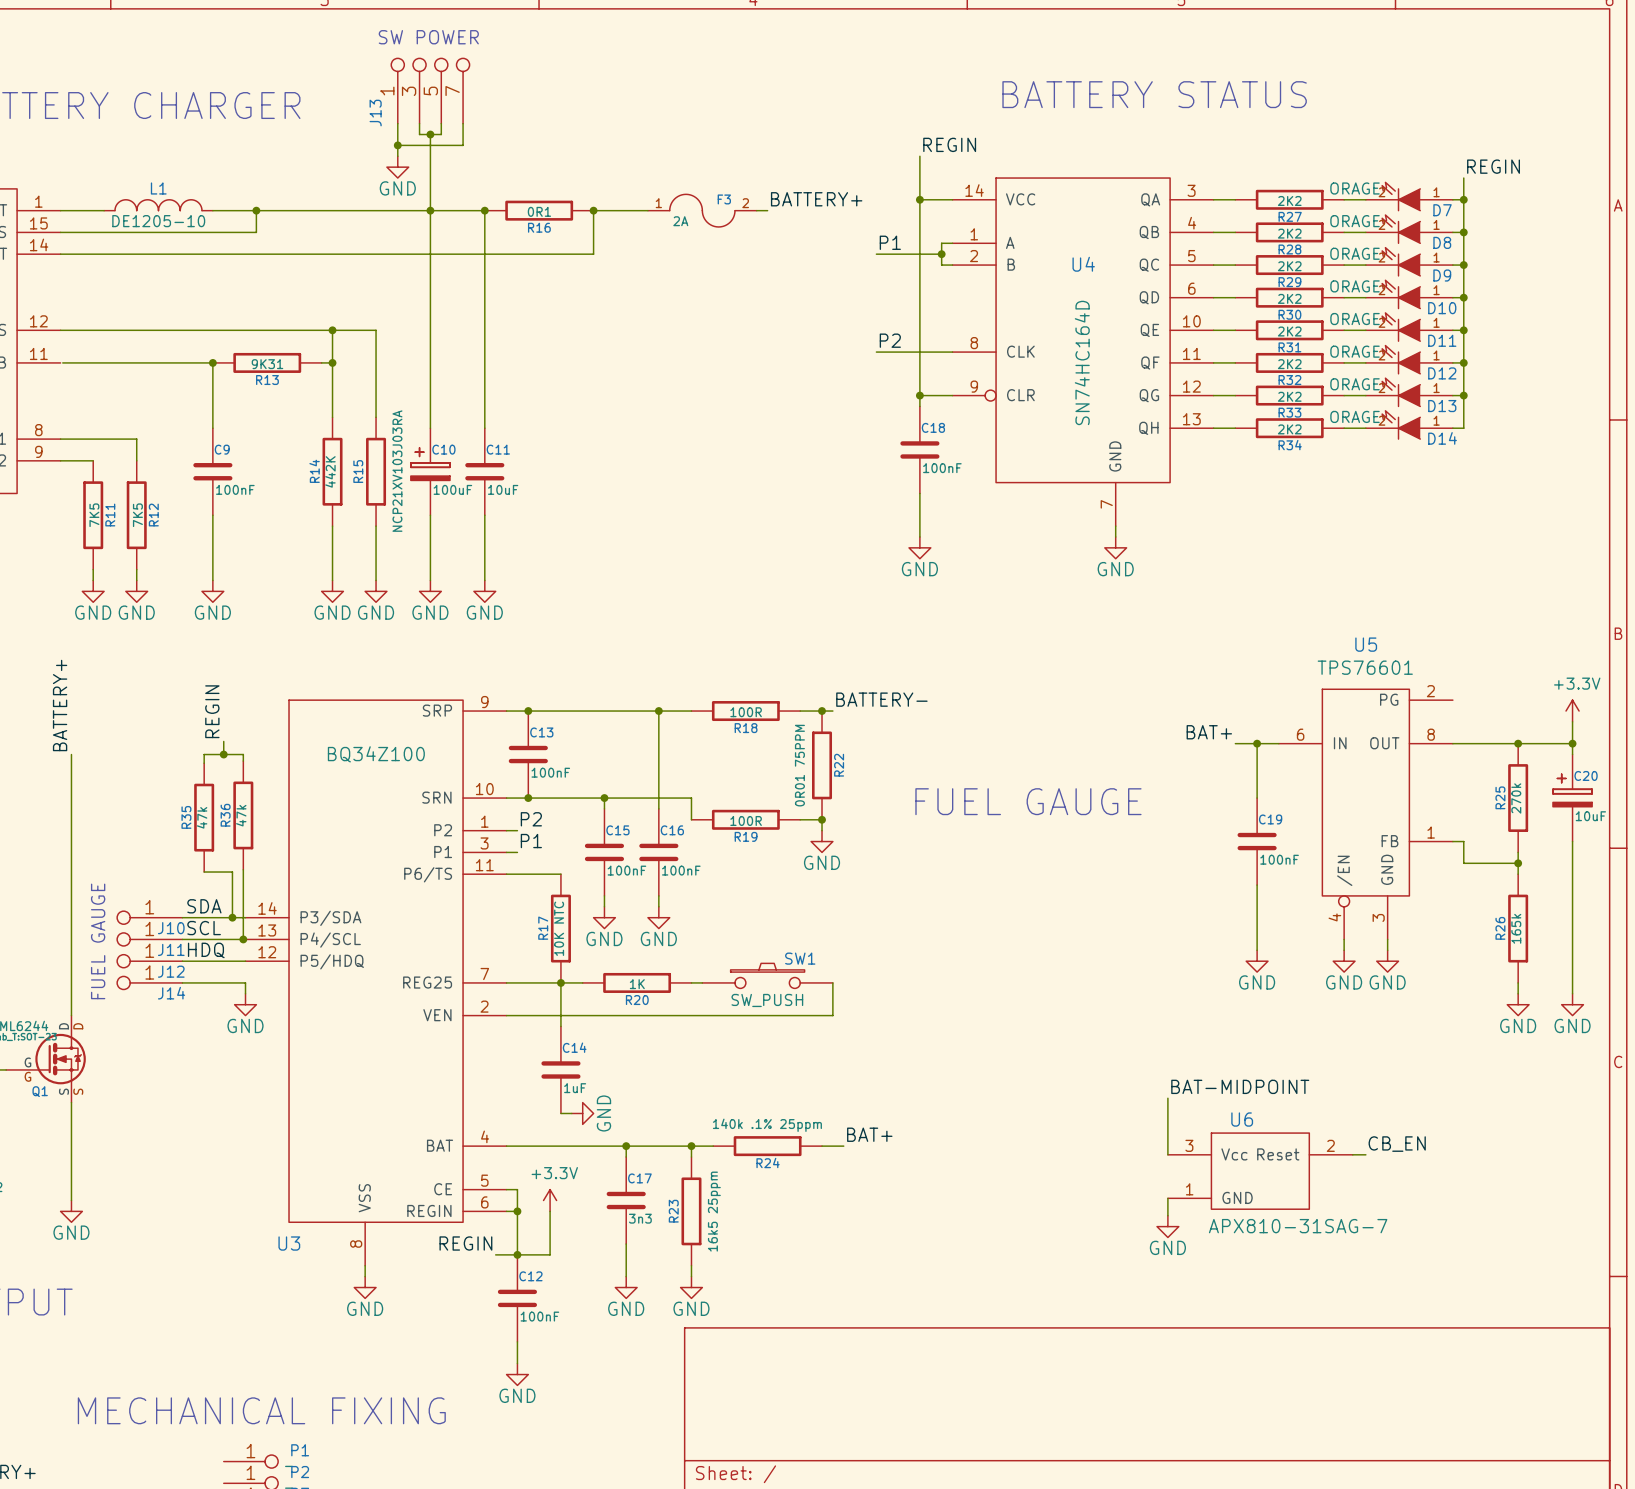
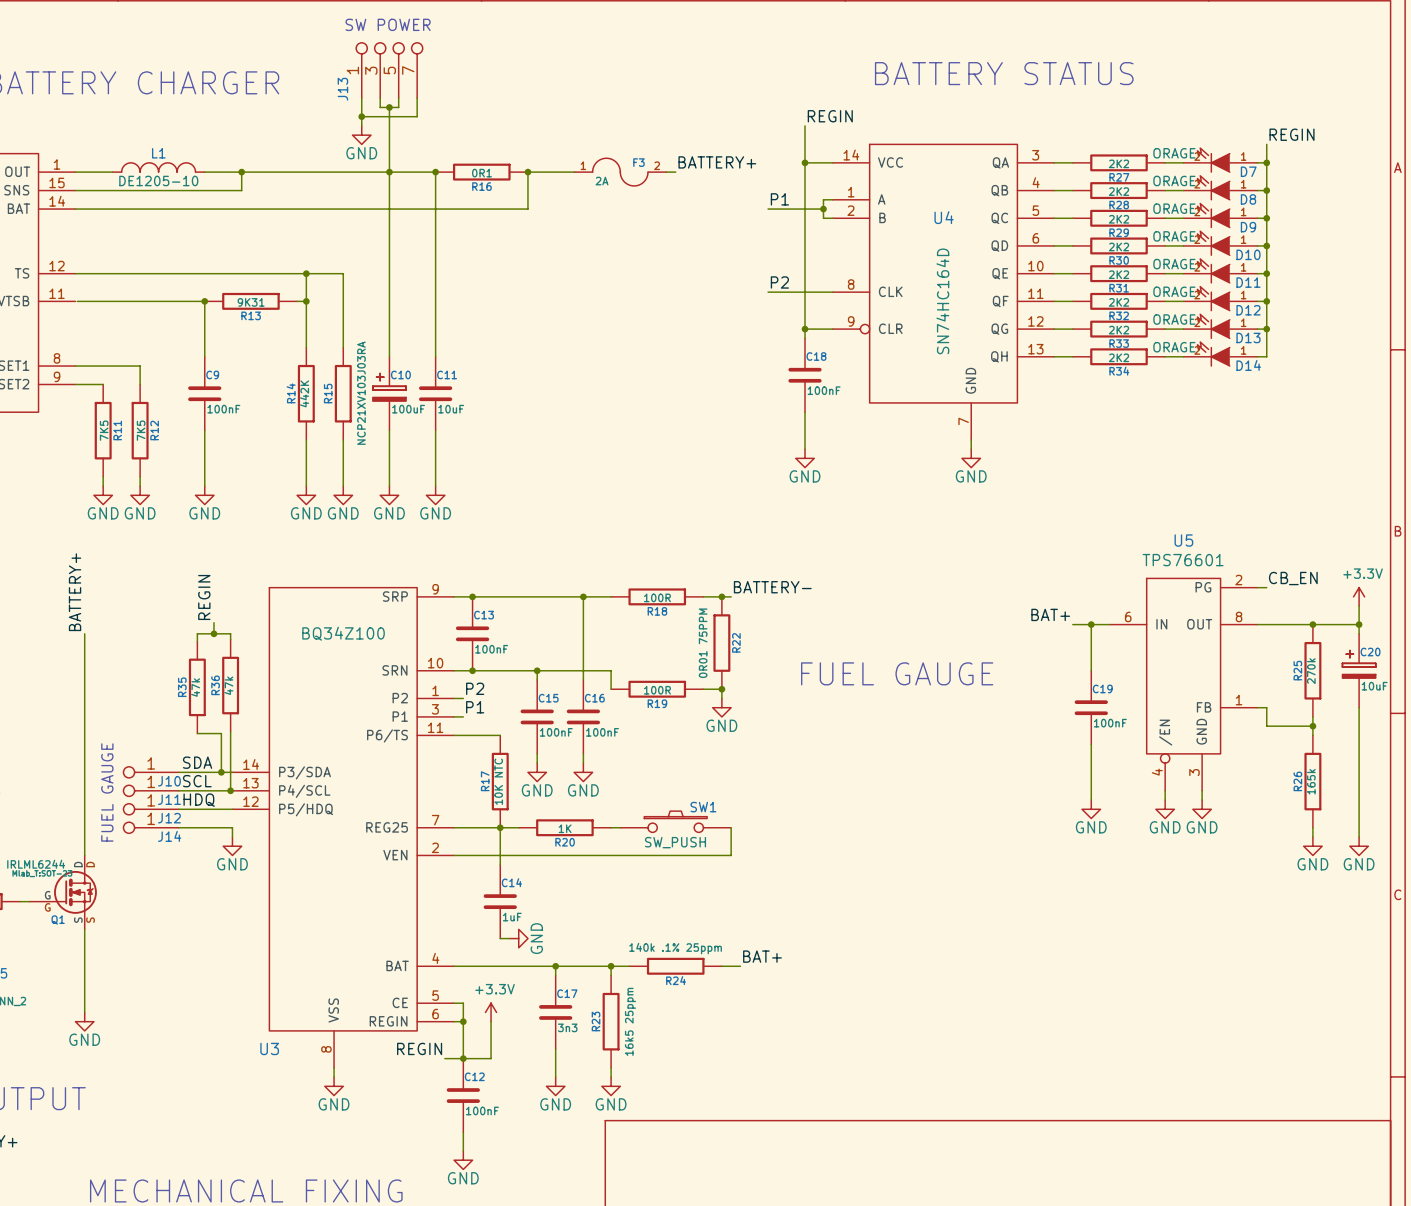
label: none -> CB_EN (1293, 578)
wire: none -> (1257, 587) (1266, 587)
label: BAT-MIDPOINT (1240, 1086) -> none
wire: (1167, 1098) (1167, 1154) -> none
label: CB_EN (1397, 1144) -> none
wire: (1352, 1154) (1365, 1154) -> none
U6: APX810-31SAG-7 (1260, 1171) -> none
wire: (1167, 1198) (1167, 1215) -> none
power symbol: GND (1167, 1226) -> none

